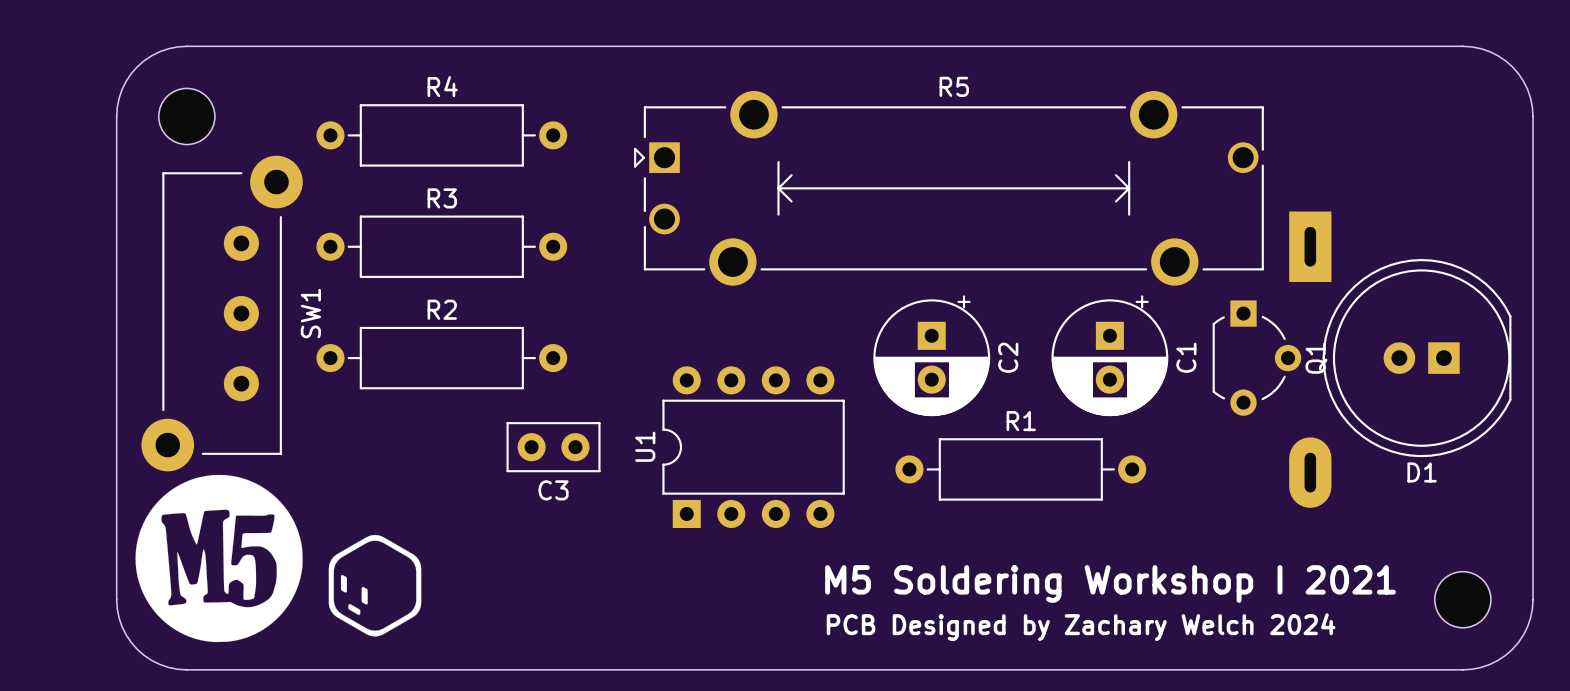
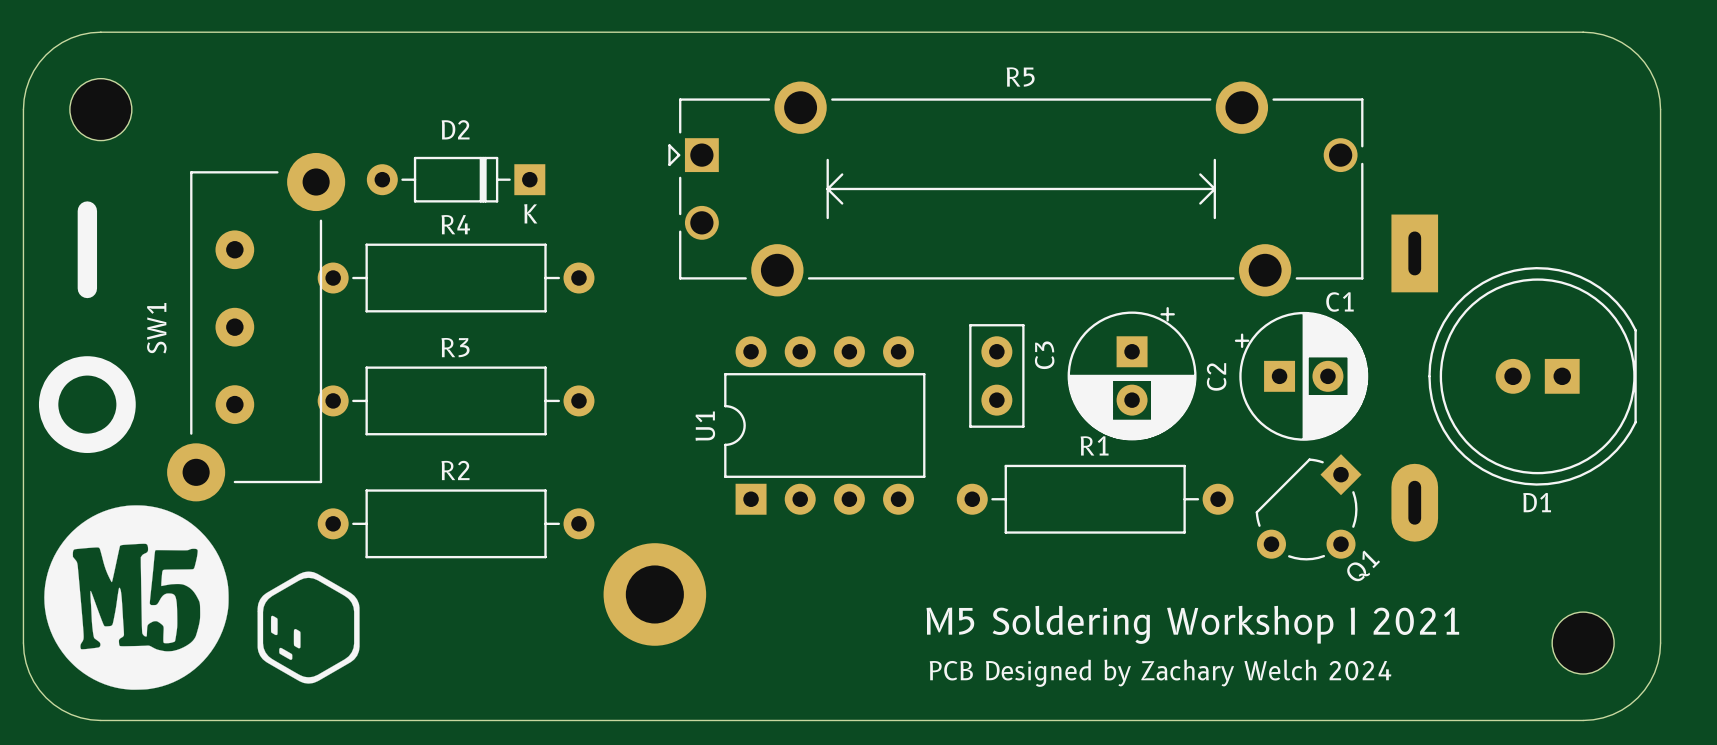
board edge: (186, 46) (159, 51) (137, 66) (122, 89) (116, 116) (117, 608) (126, 634) (144, 655) (168, 667) (186, 669) -> (174, 32) (90, 32) (62, 42) (46, 54) (33, 70) (26, 89) (23, 109) (23, 643) (26, 663) (33, 681) (46, 697) (71, 714) (100, 720) (174, 720)
part position: (186, 116) -> (100, 109)
R4 position: (441, 135) -> (456, 278)
D2: none -> (456, 179)
drawing: none -> [38, 201, 136, 453]
R3 position: (441, 246) -> (456, 400)
SW1 rotation: 0° (222, 313) -> 180° (256, 327)
C2 position: (931, 355) -> (1132, 373)
C1 rotation: 0° (1109, 355) -> 90° counterclockwise (1301, 376)
C1 position: (1109, 355) -> (1301, 376)
C1 name position: C1 (1186, 357) -> C1 (1339, 301)
R2 position: (441, 358) -> (456, 523)
Q1 rotation: 0° (1256, 358) -> 45° clockwise (1308, 507)
Q1 position: (1256, 358) -> (1308, 507)
C3 rotation: 0° (553, 447) -> 90° clockwise (996, 375)
C3 position: (553, 447) -> (996, 375)
U1 position: (753, 447) -> (824, 425)
C3 name position: C3 (553, 490) -> C3 (1044, 355)
part: none -> (654, 594)
drawing position: (219, 558) -> (136, 597)
drawing position: (375, 585) -> (308, 627)

